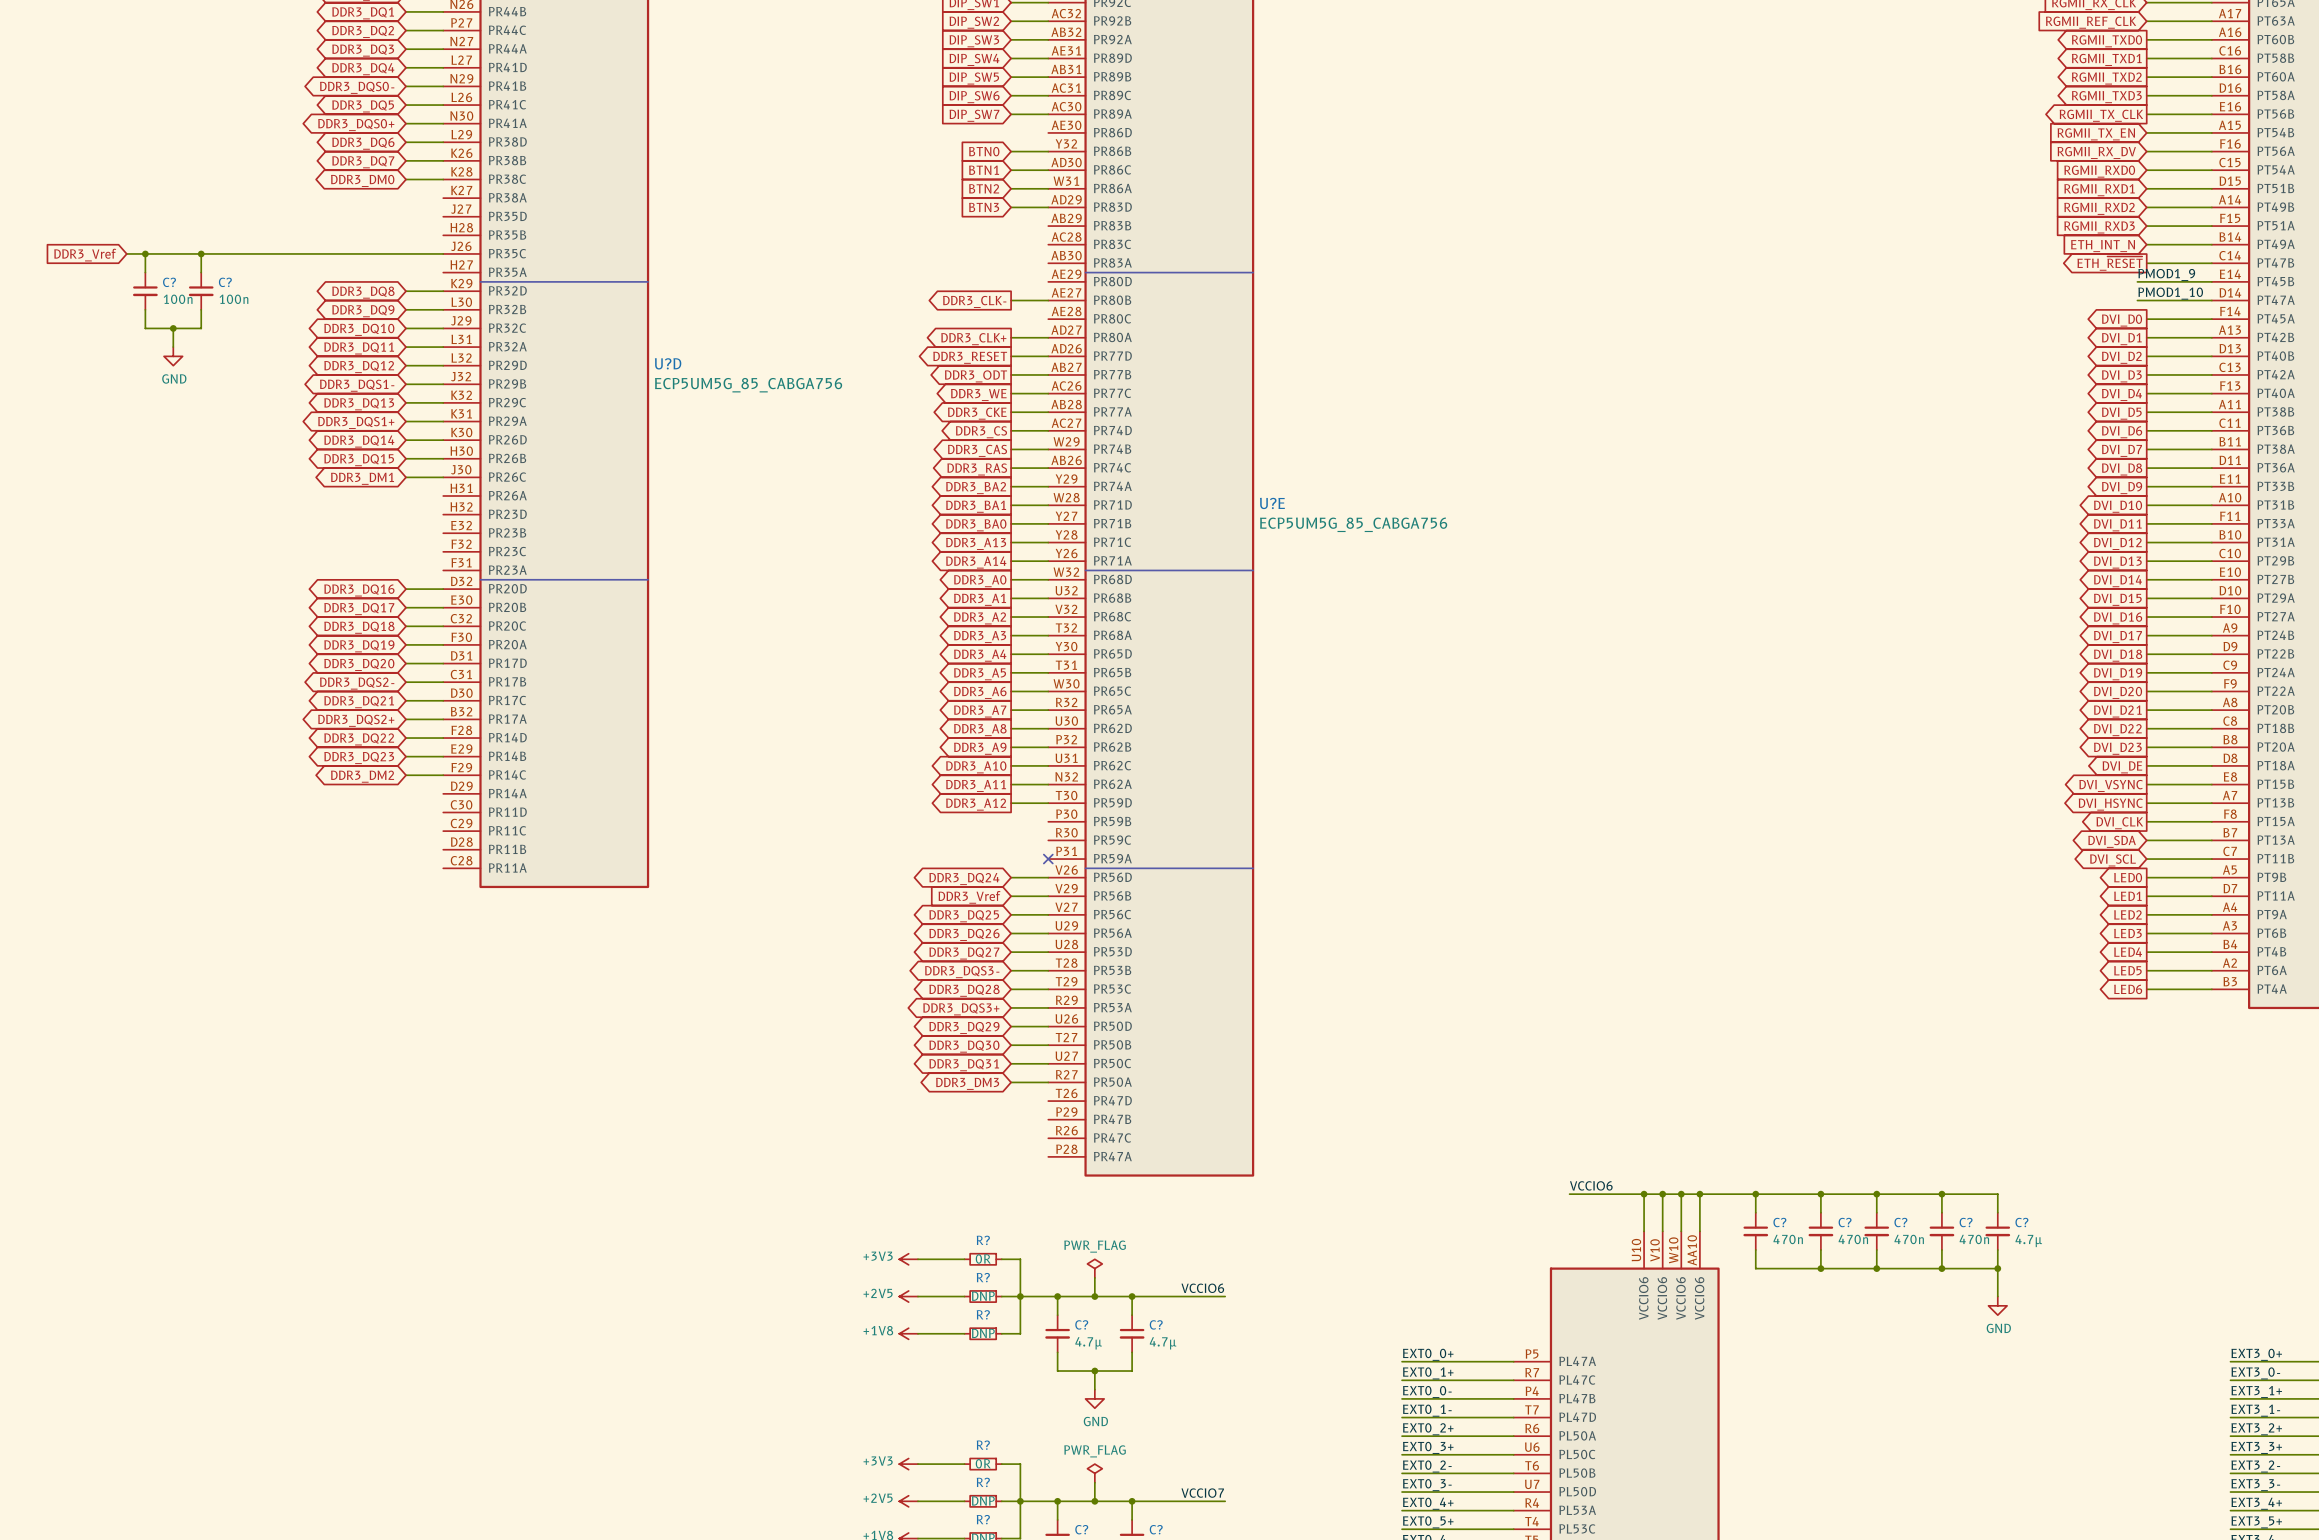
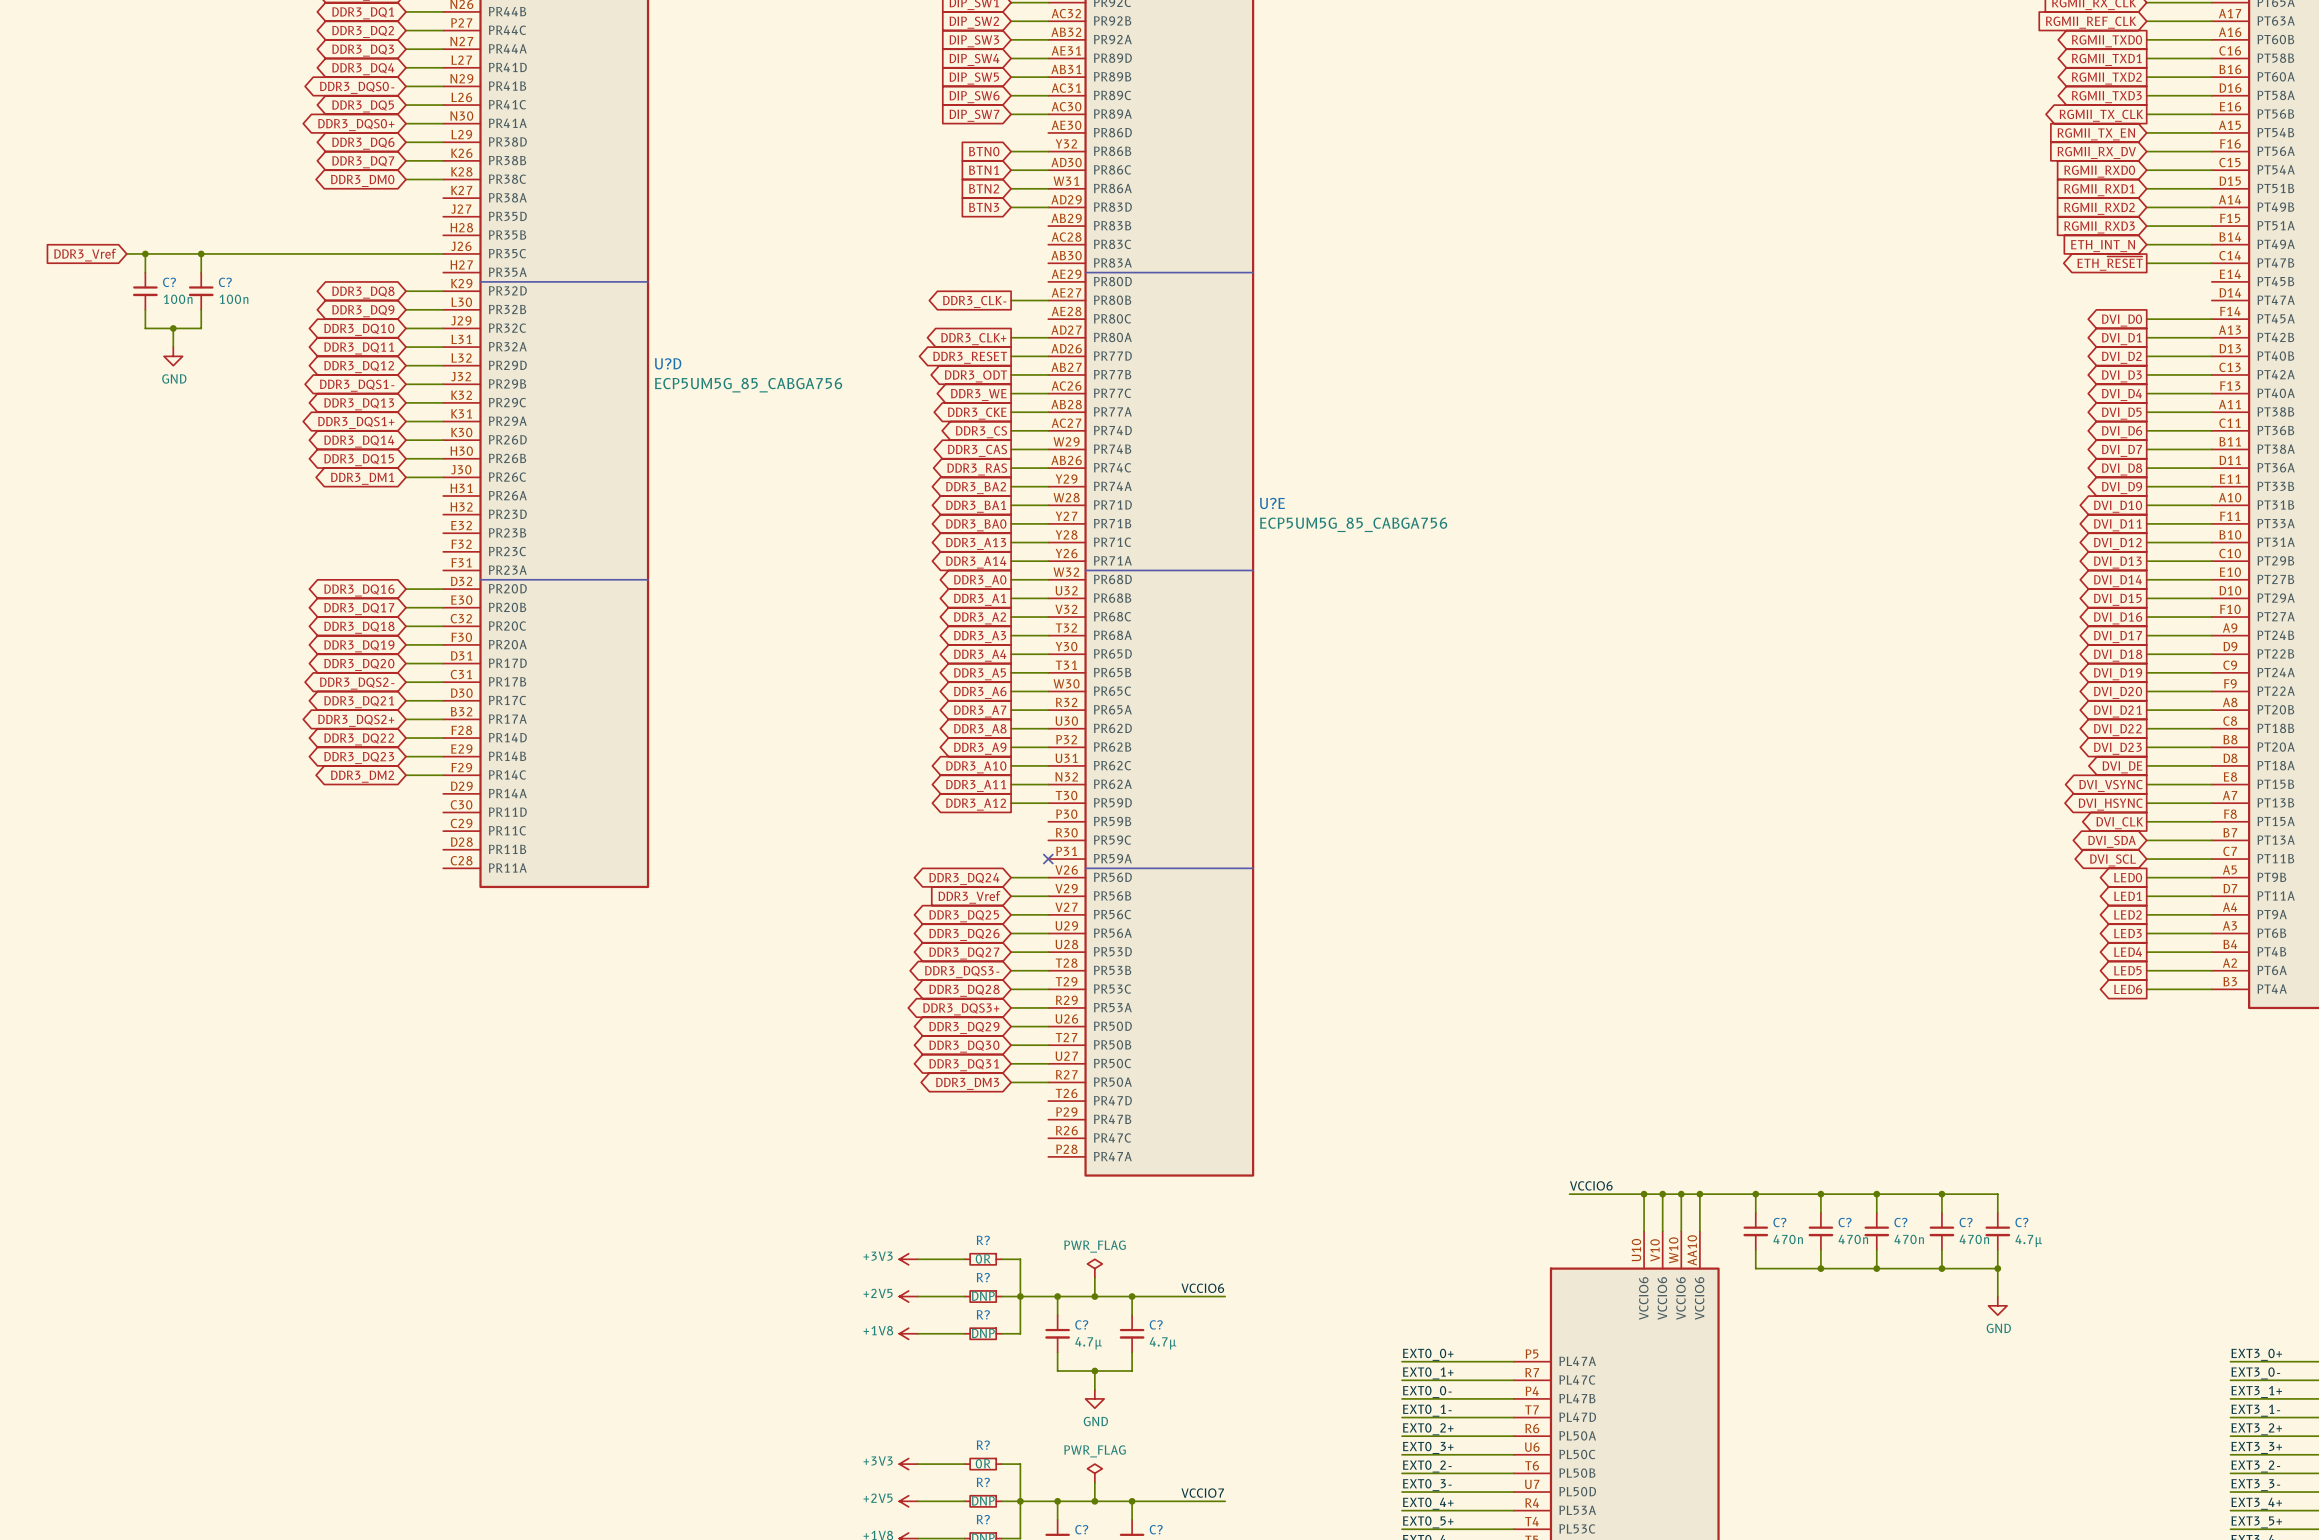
label: PMOD1_9 (2166, 274) -> none
wire: (2137, 281) (2211, 281) -> none
label: PMOD1_10 (2170, 293) -> none
wire: (2137, 300) (2211, 300) -> none

